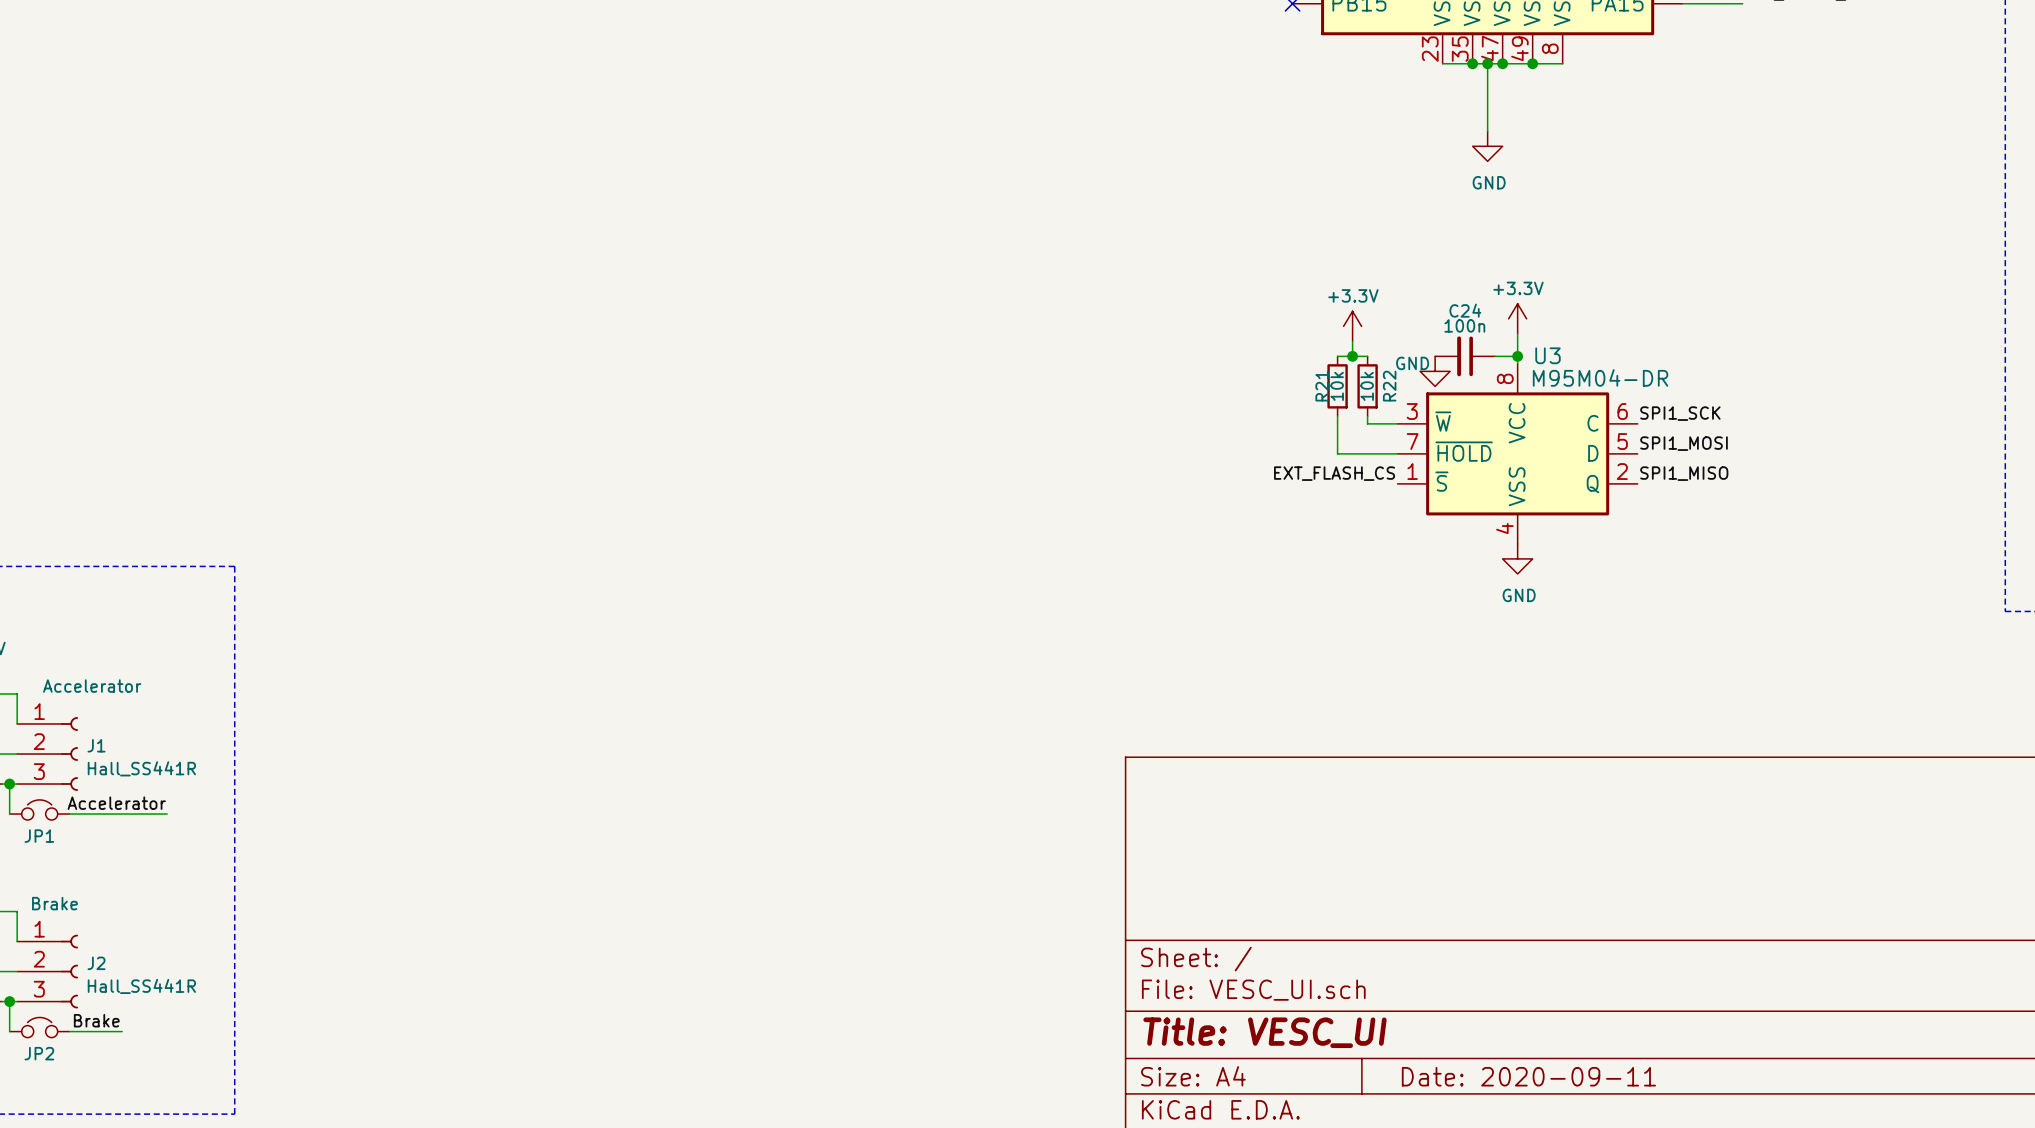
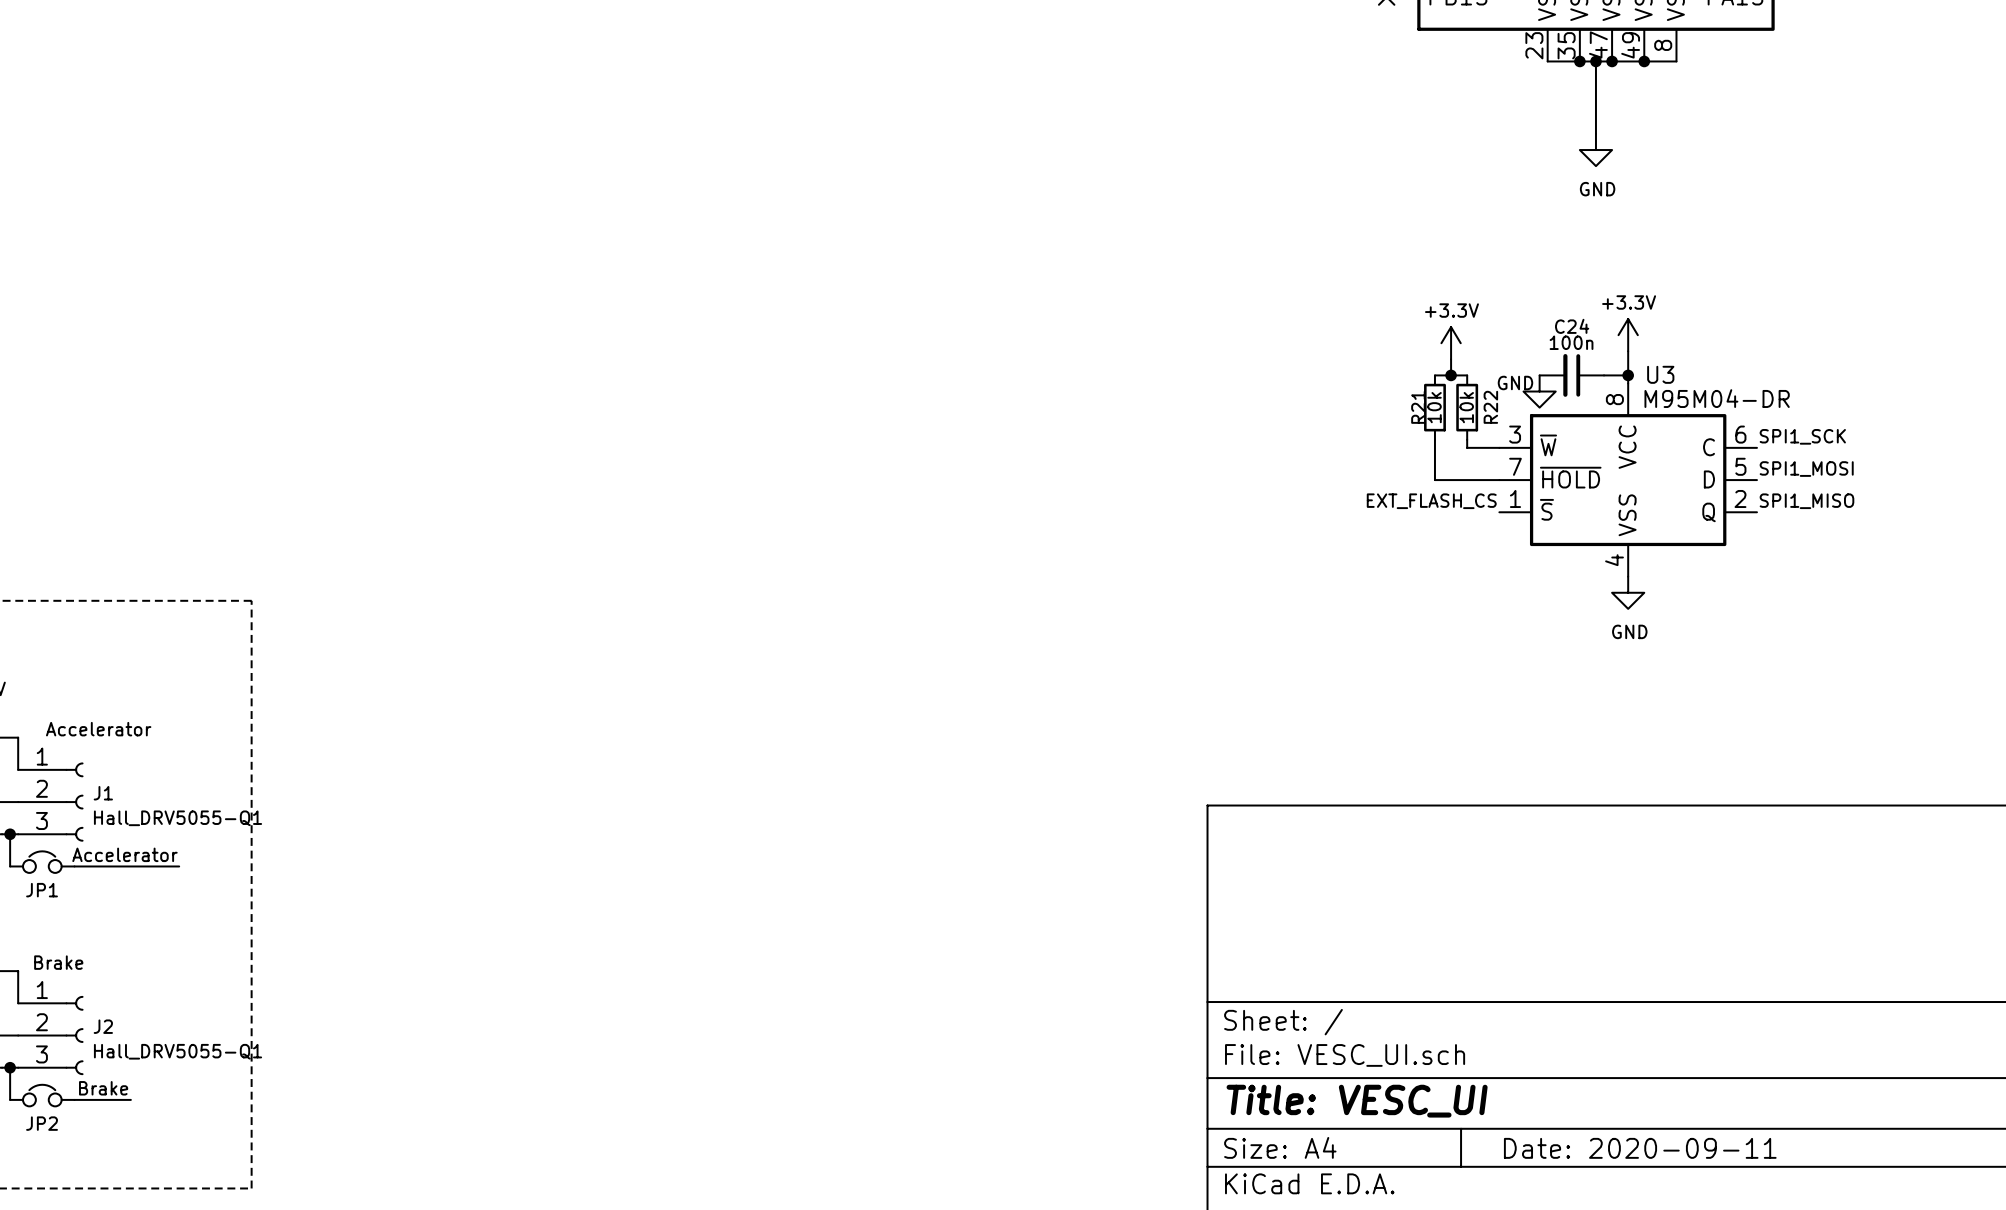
J1 value: Hall_SS441R (141, 768) -> Hall_DRV5055-Q1 (178, 818)
J2 value: Hall_SS441R (141, 986) -> Hall_DRV5055-Q1 (178, 1051)

